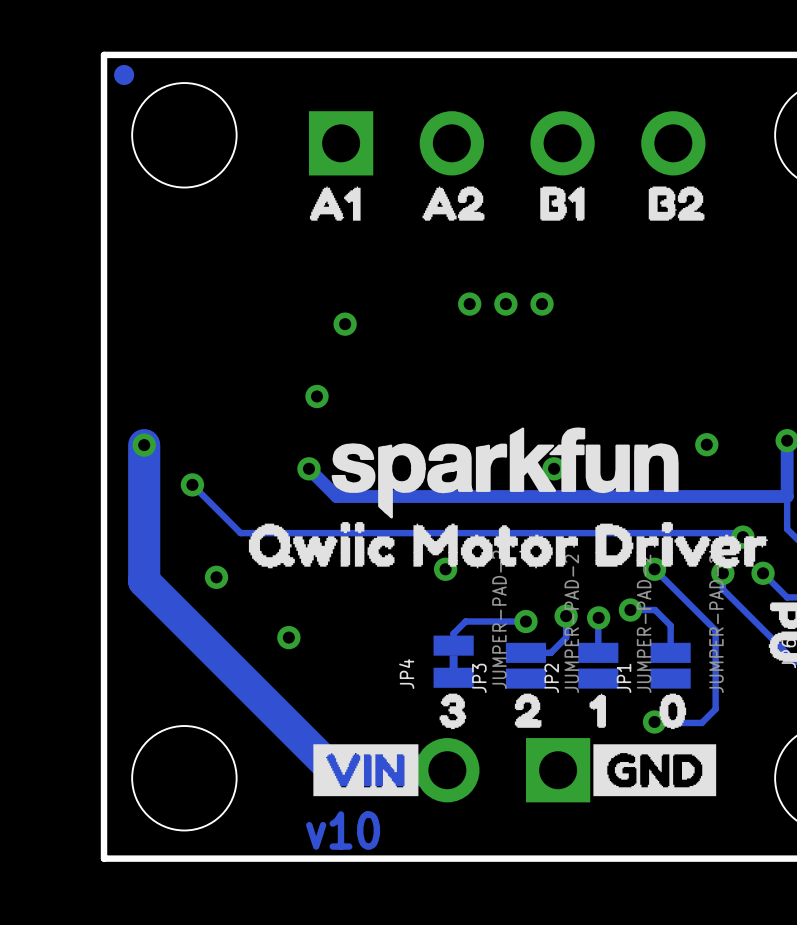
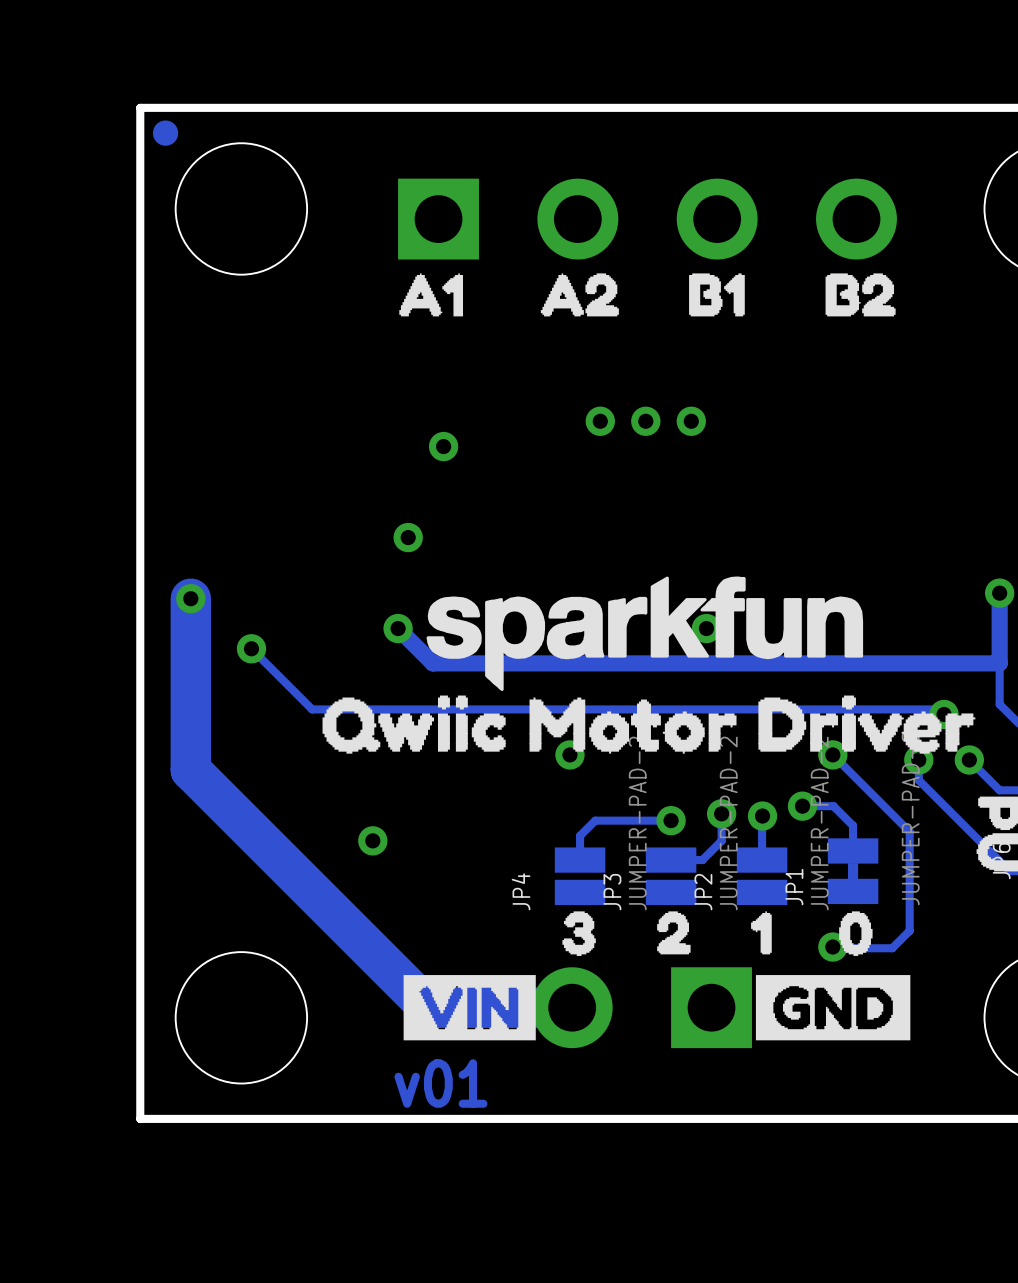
via: (706, 444) -> none
part: (216, 577) -> none
JP4 footprint: [433, 635, 474, 688] -> [554, 847, 606, 906]
JP1 footprint: [650, 642, 691, 689] -> [827, 838, 879, 905]
text: v10 (343, 830) -> v01 (440, 1083)

